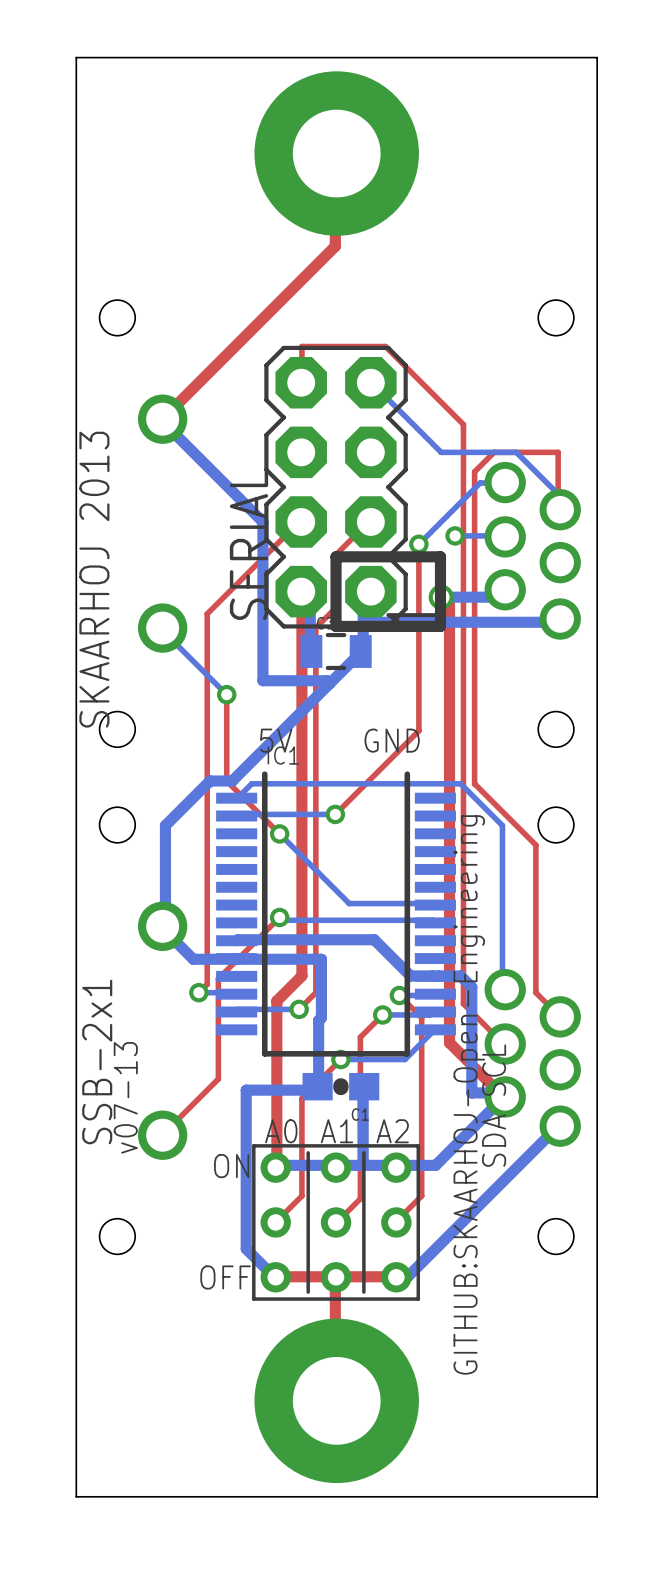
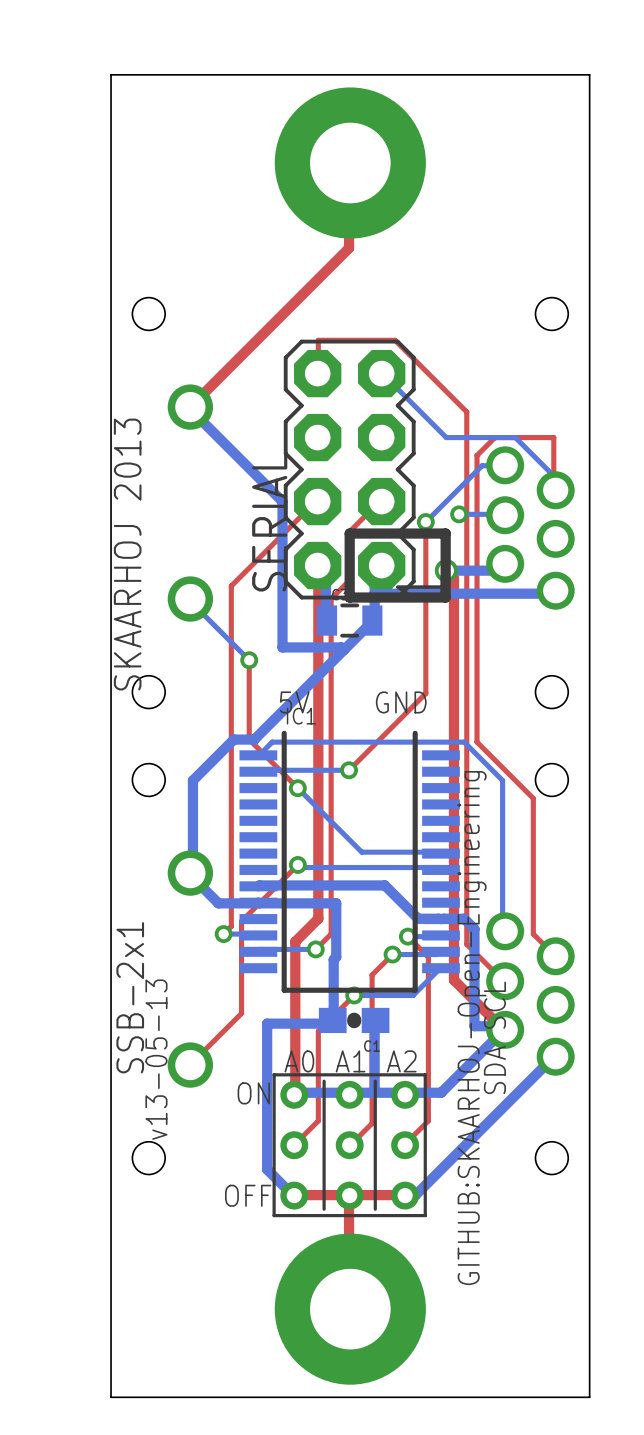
text: v07-13 (125, 1097) -> v13-05-13 (156, 1059)

